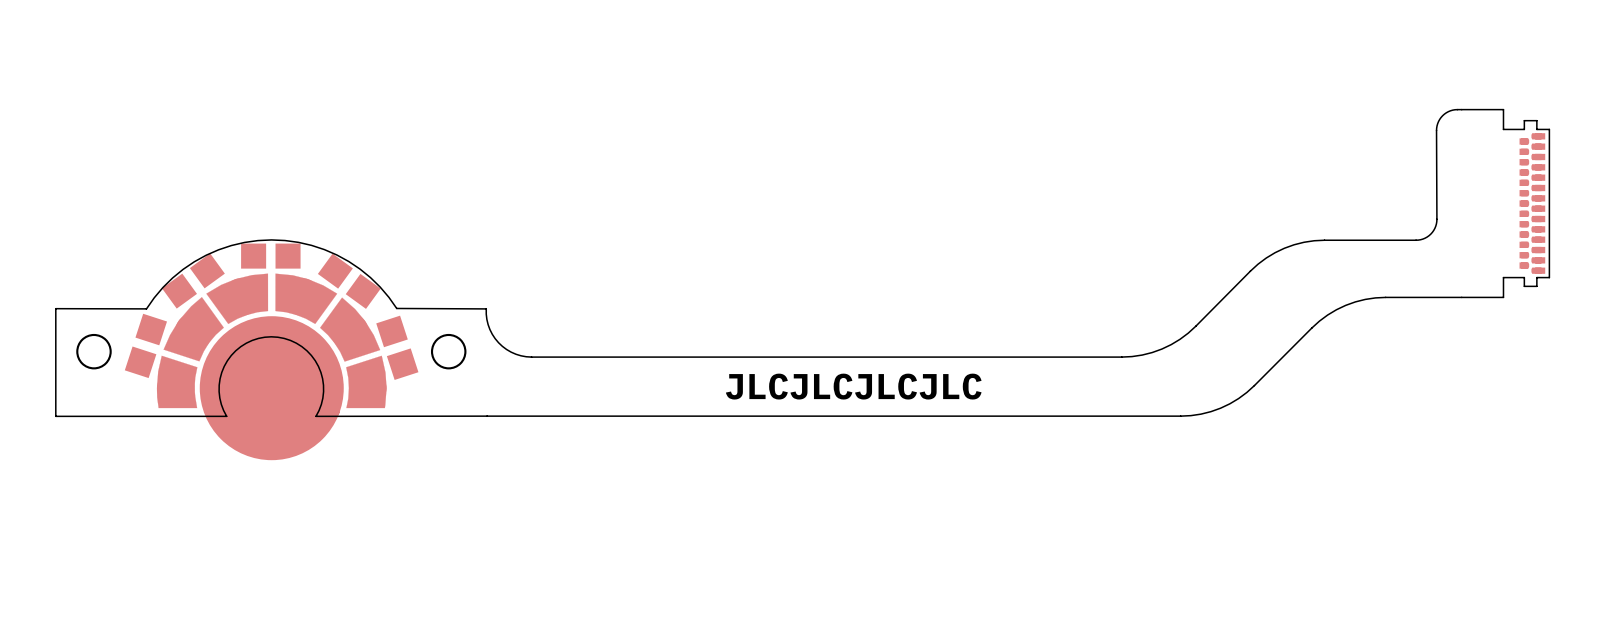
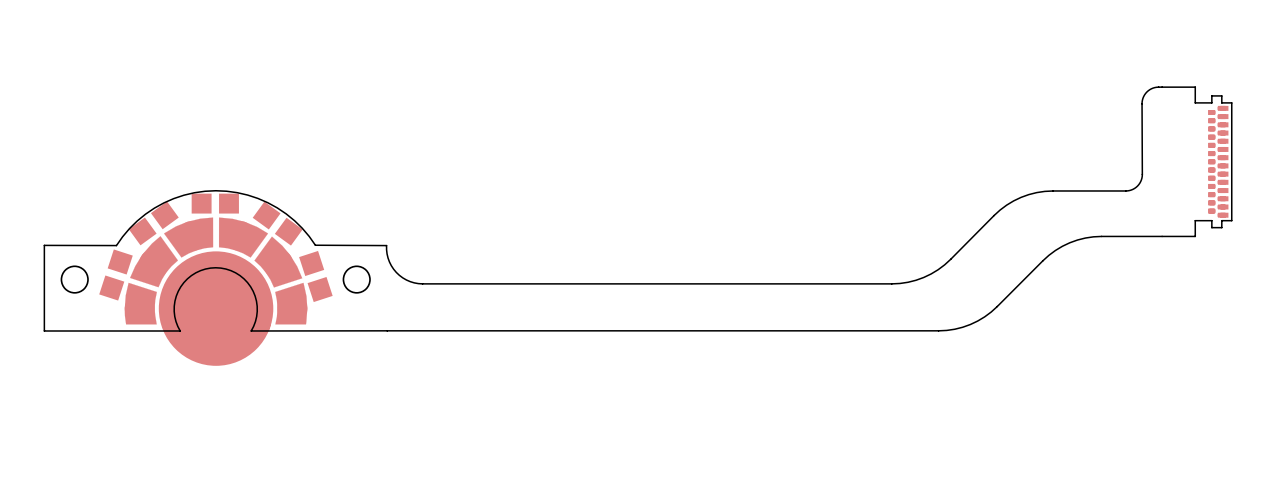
text: JLCJLCJLCJLC (853, 386) -> none

